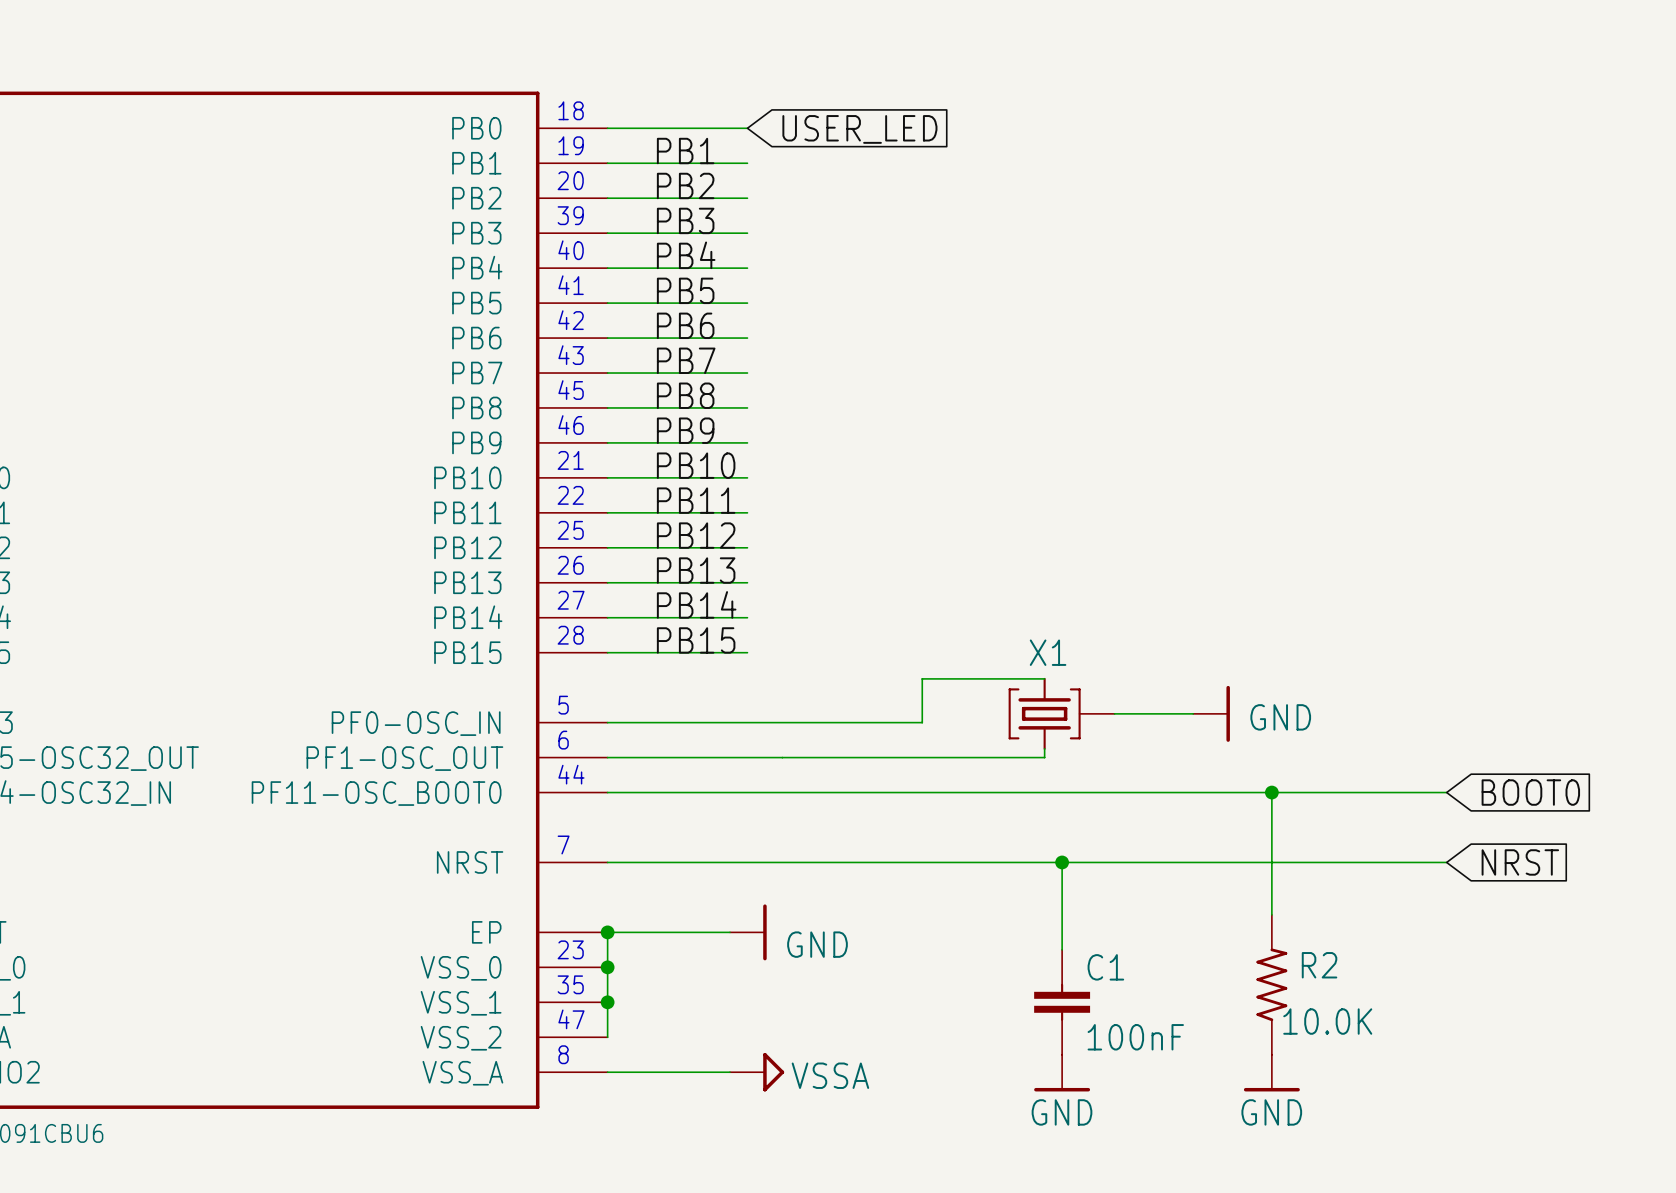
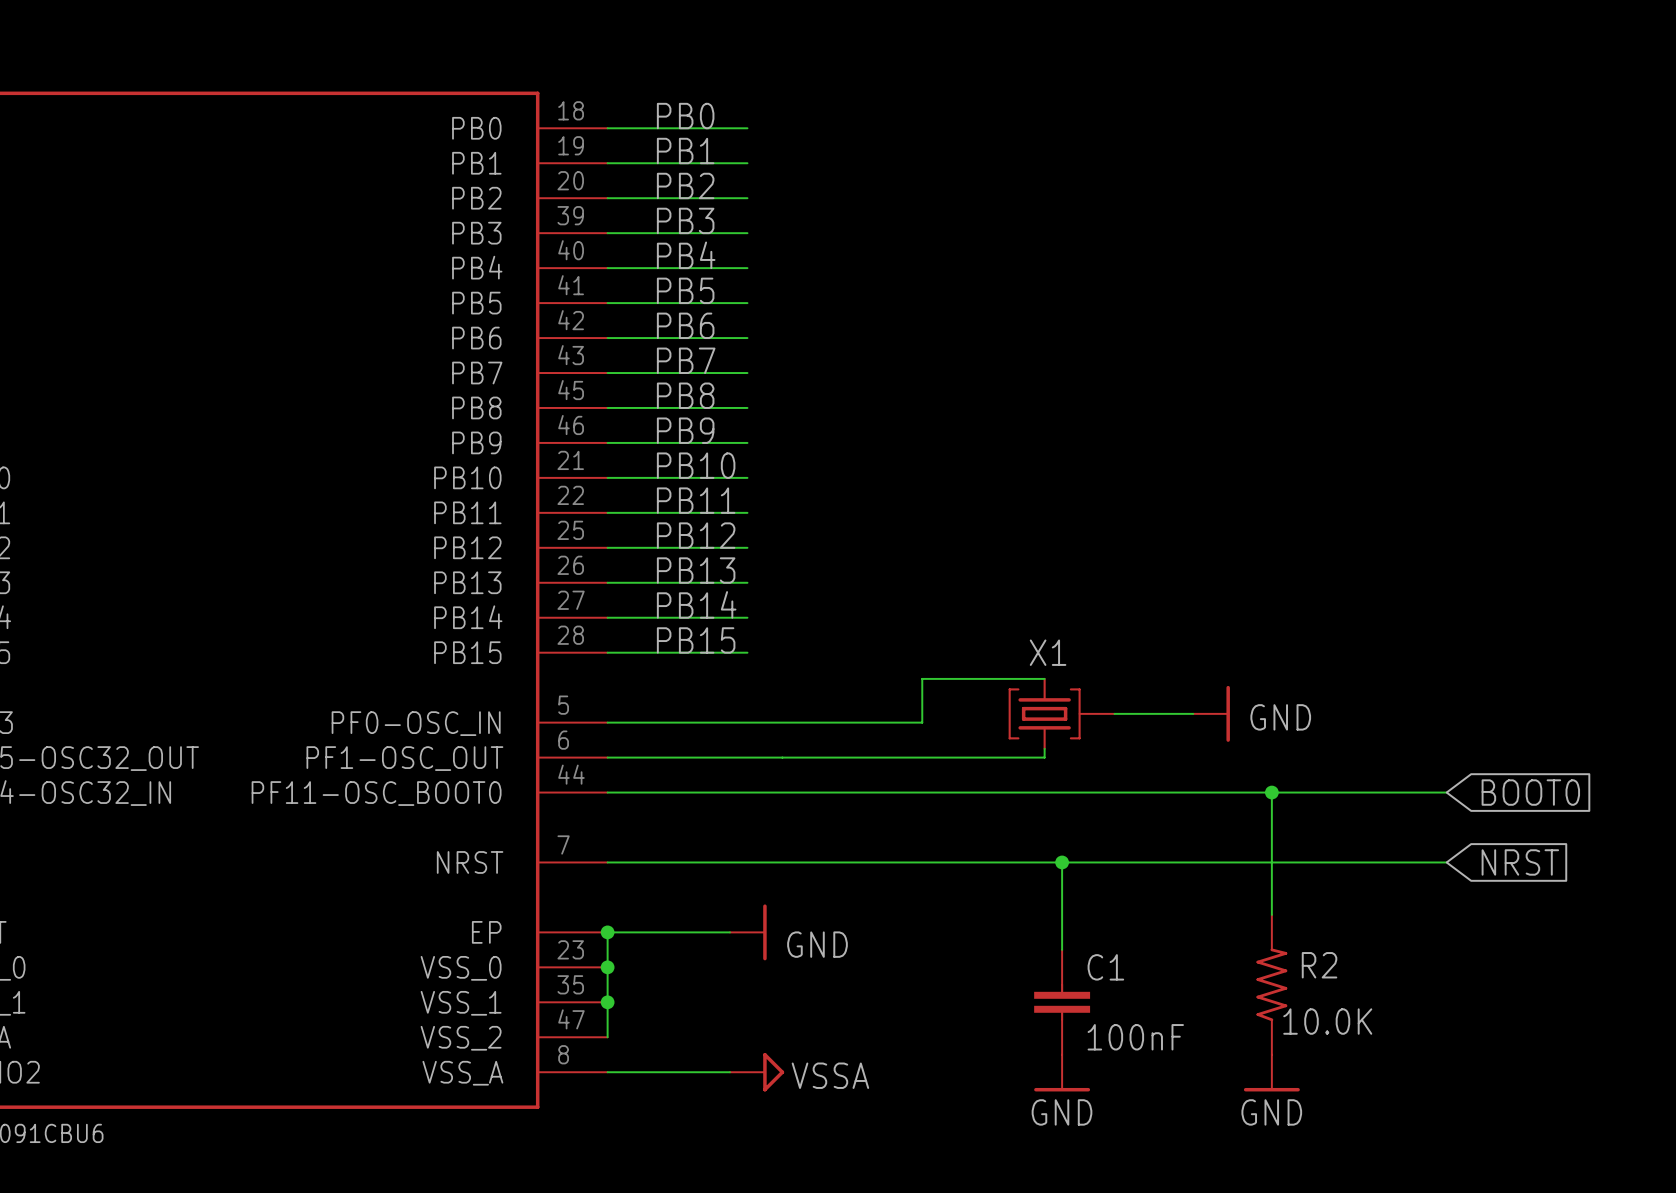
label: none -> PB0 (685, 116)
global label: USER_LED (859, 129) -> none

